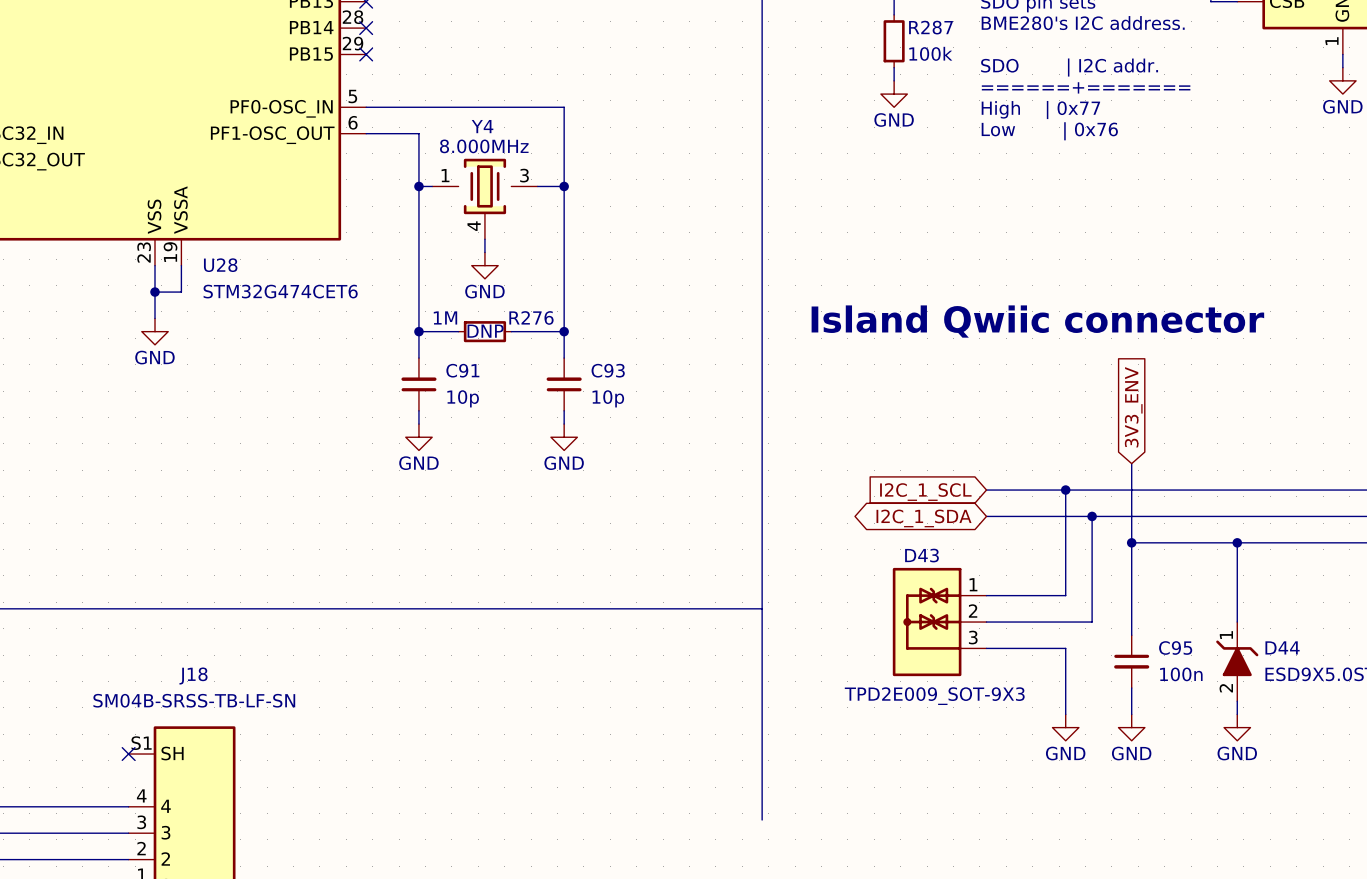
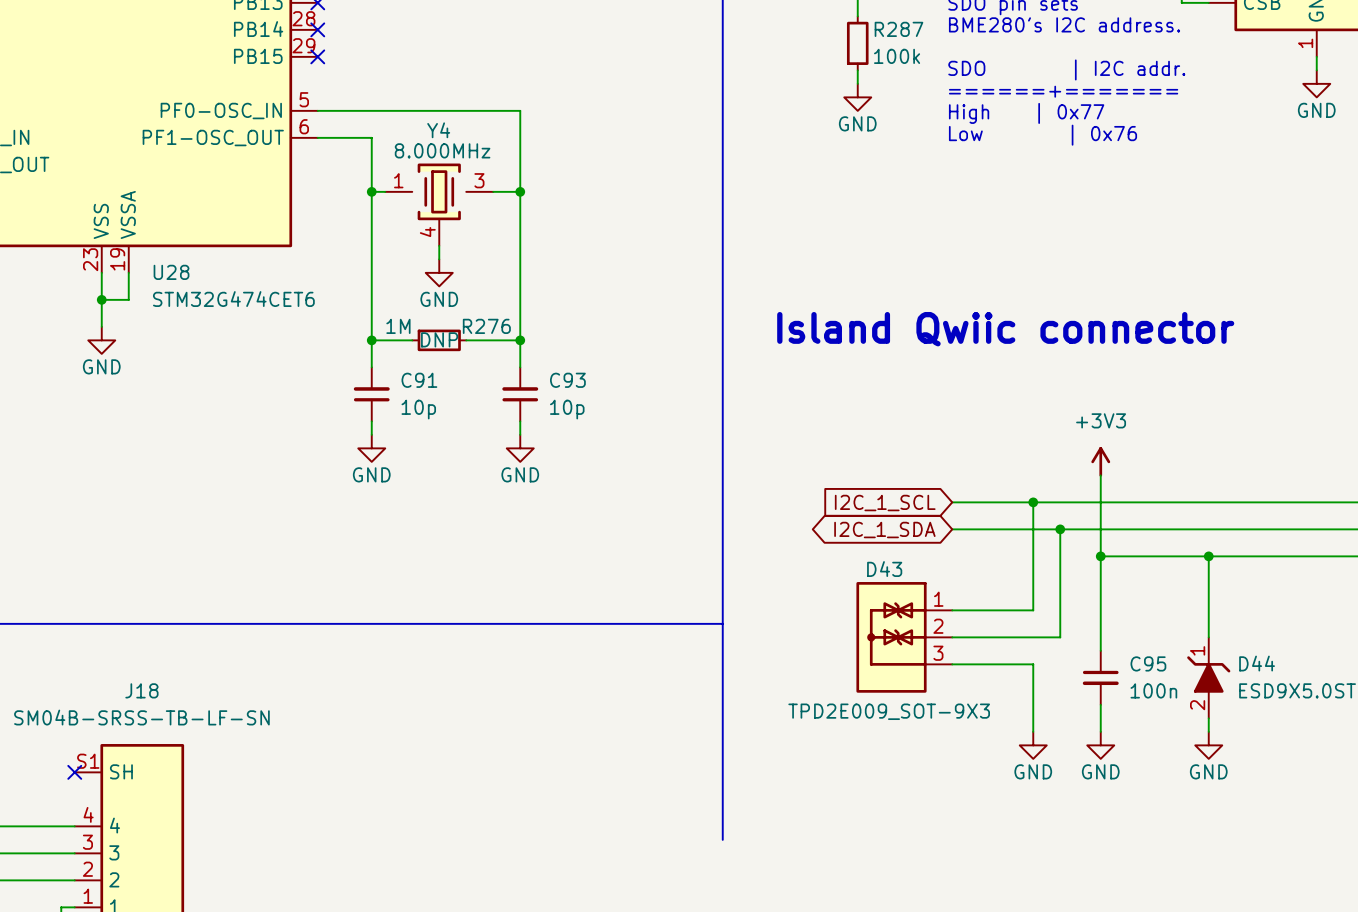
global label: 3V3_ENV (1133, 407) -> none
power symbol: none -> +3V3 (1100, 461)

